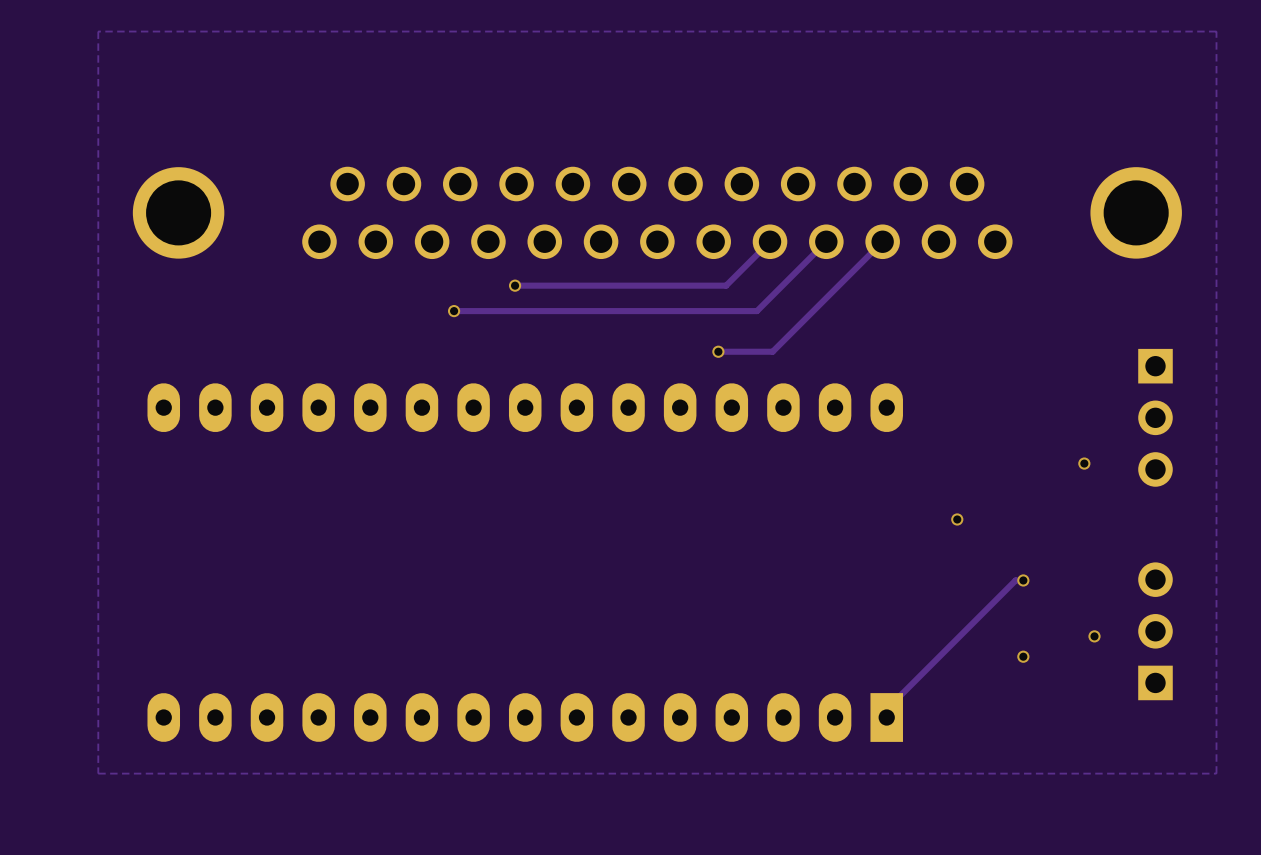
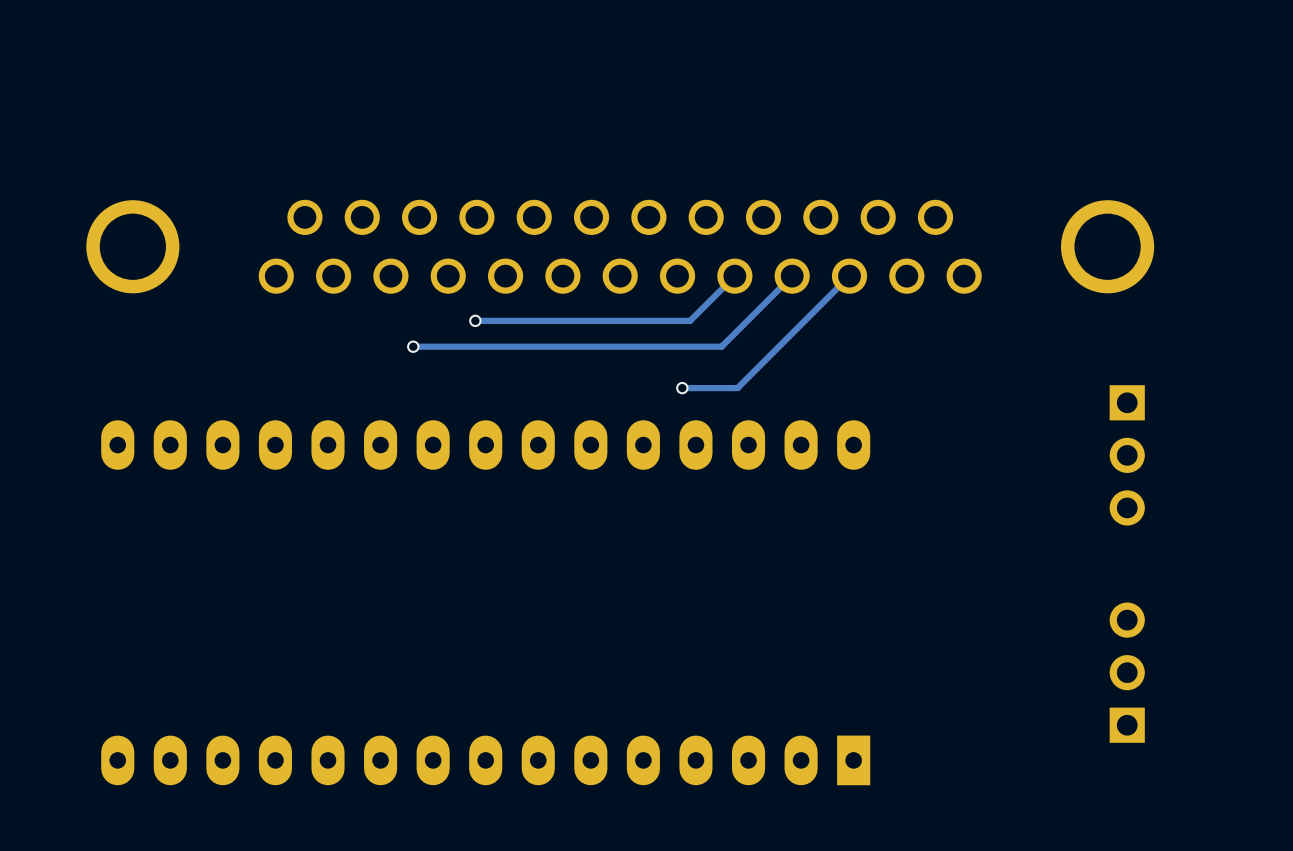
zone outline: (1216, 31) (98, 31) (98, 773) (1216, 773) (1216, 31) -> none
via: (1084, 463) -> none
via: (957, 519) -> none
track: (1023, 580) (1015, 580) (886, 709) (886, 717) -> none
via: (1023, 580) -> none
via: (1094, 636) -> none
via: (1023, 656) -> none

